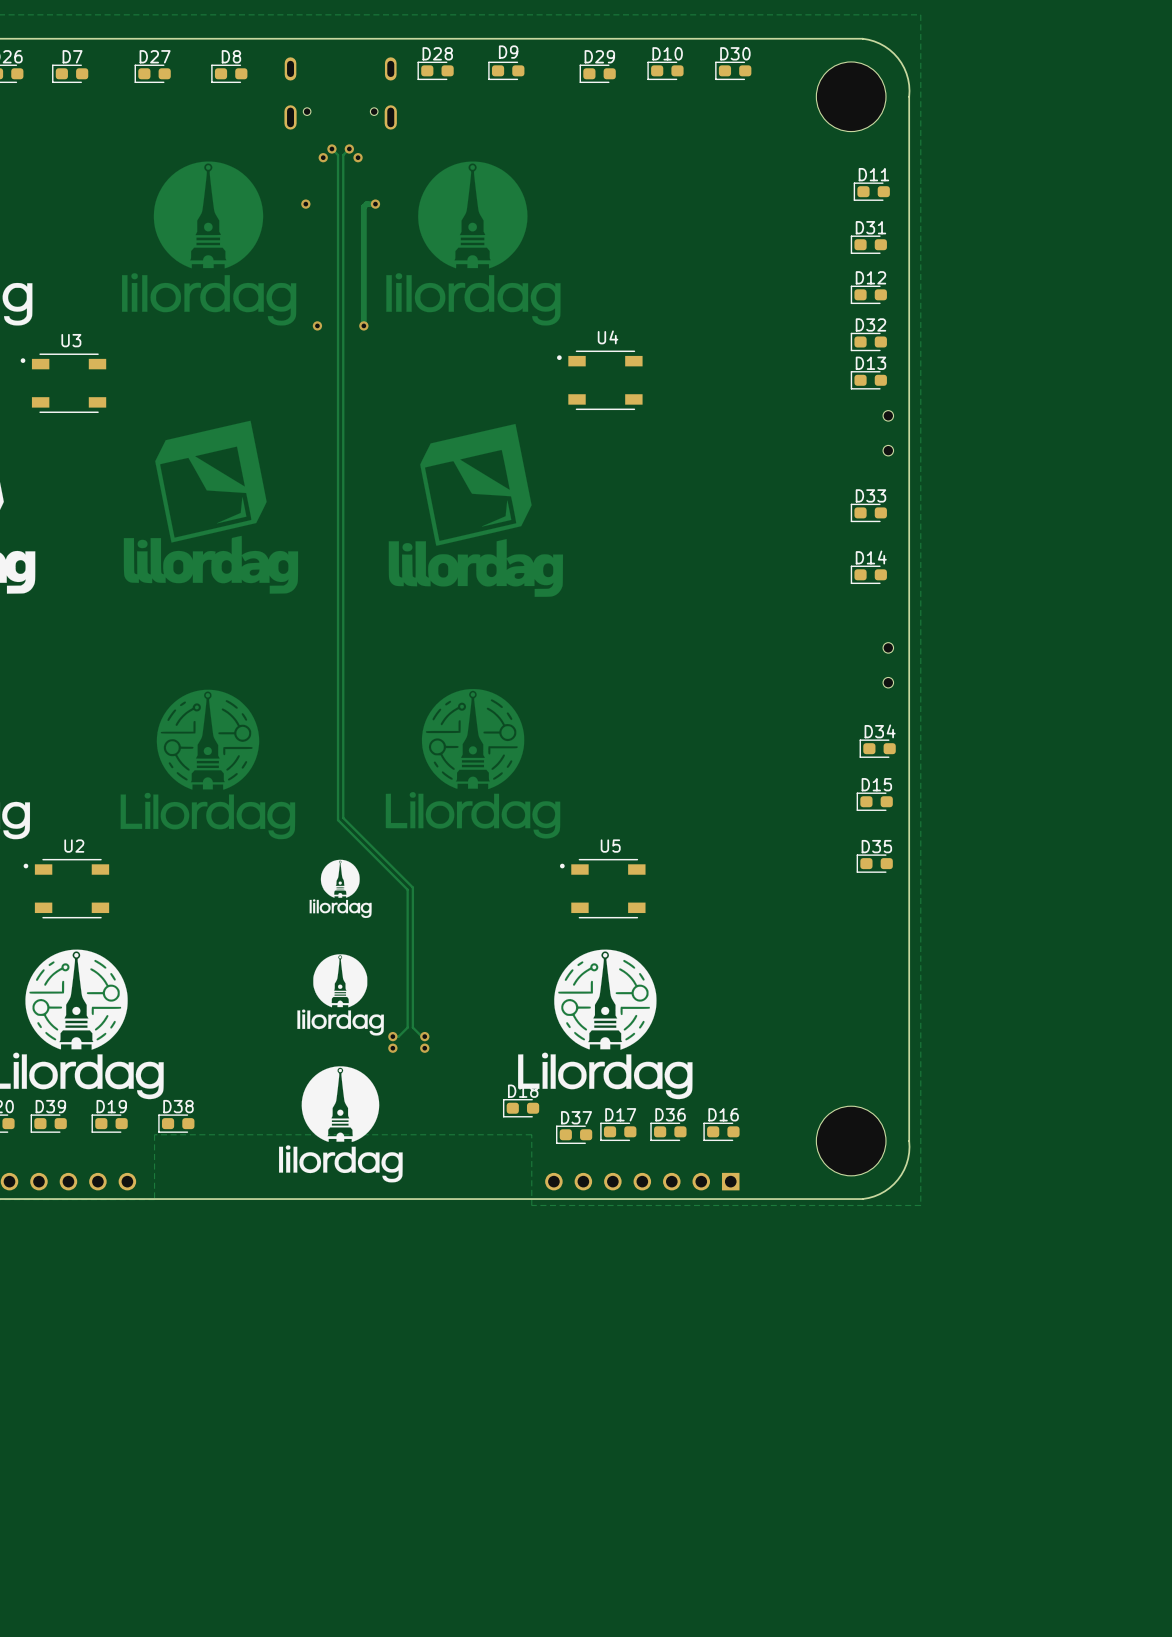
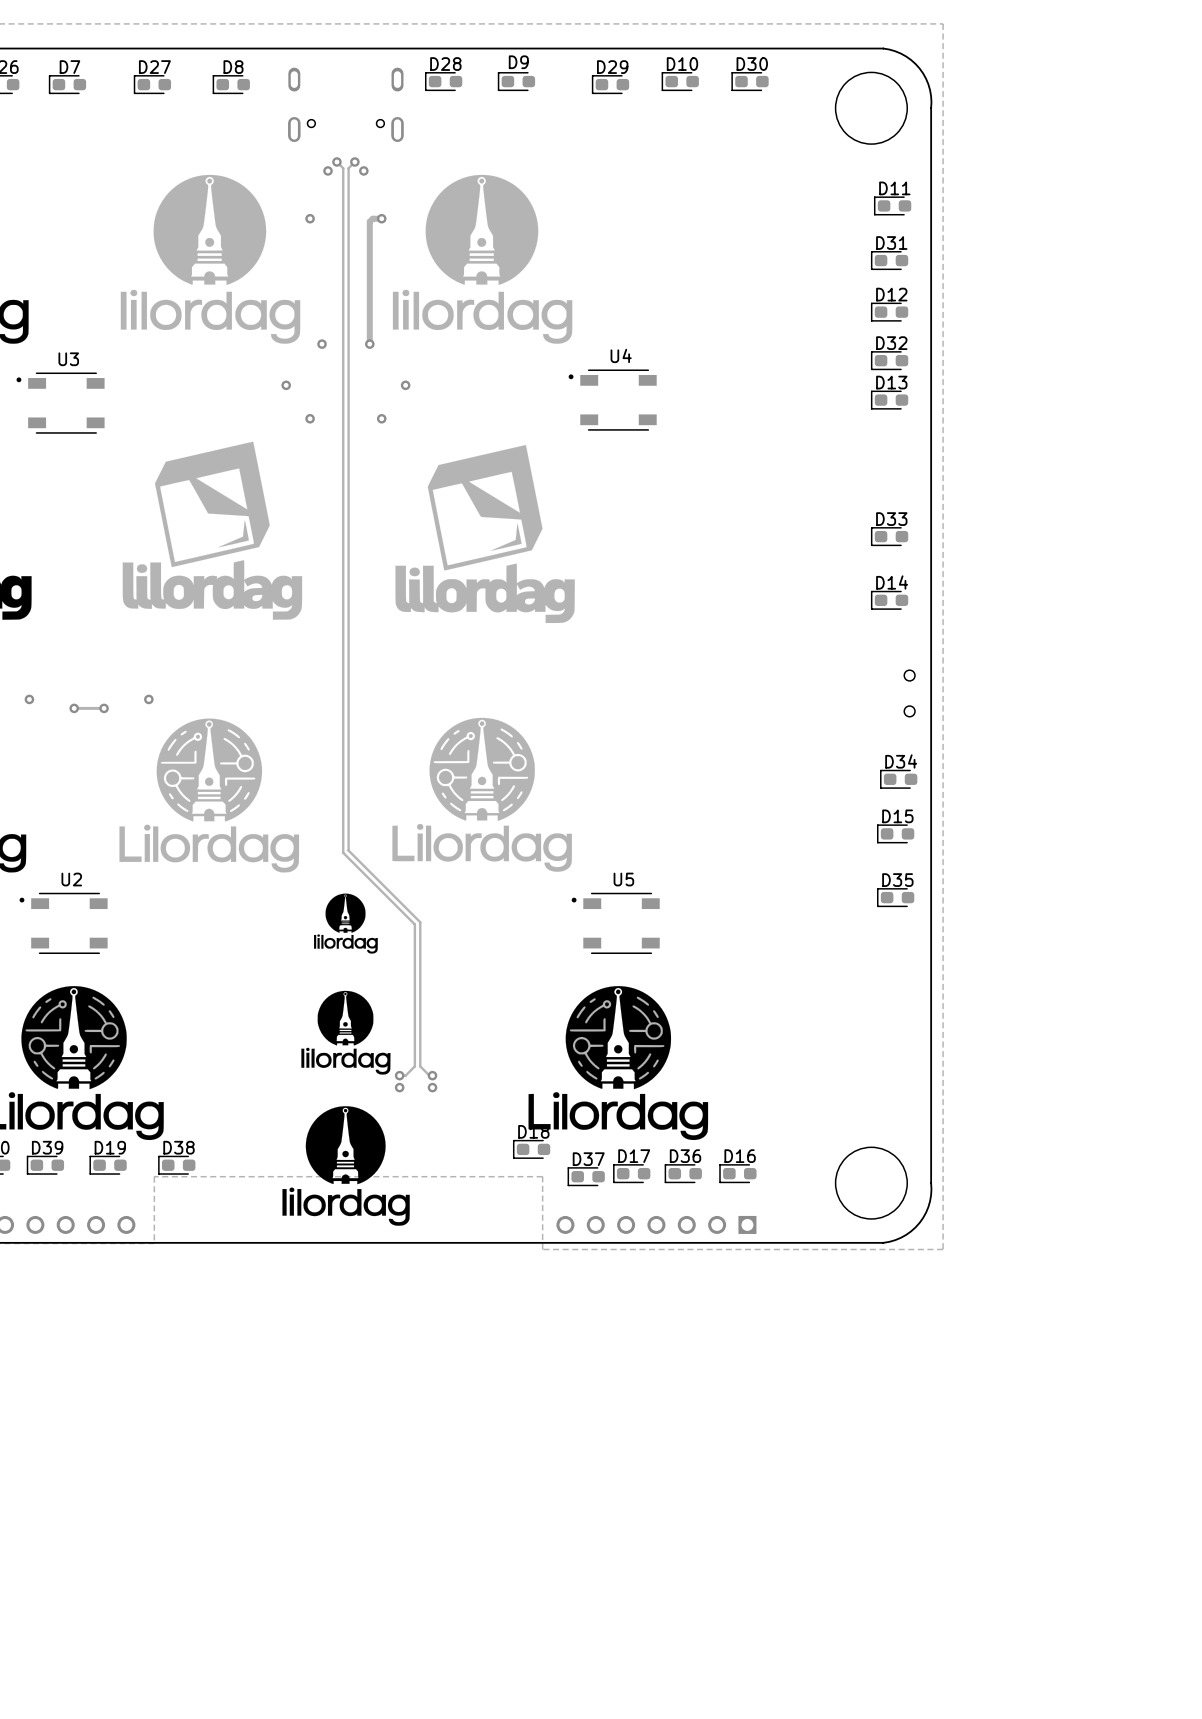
via: none -> (286, 385)
via: none -> (405, 385)
via: none -> (310, 418)
via: none -> (381, 418)
part: (888, 433) -> none
via: none -> (29, 699)
via: none -> (148, 699)
track: none -> (74, 708) (104, 708)
via: none -> (74, 708)
via: none -> (104, 708)

